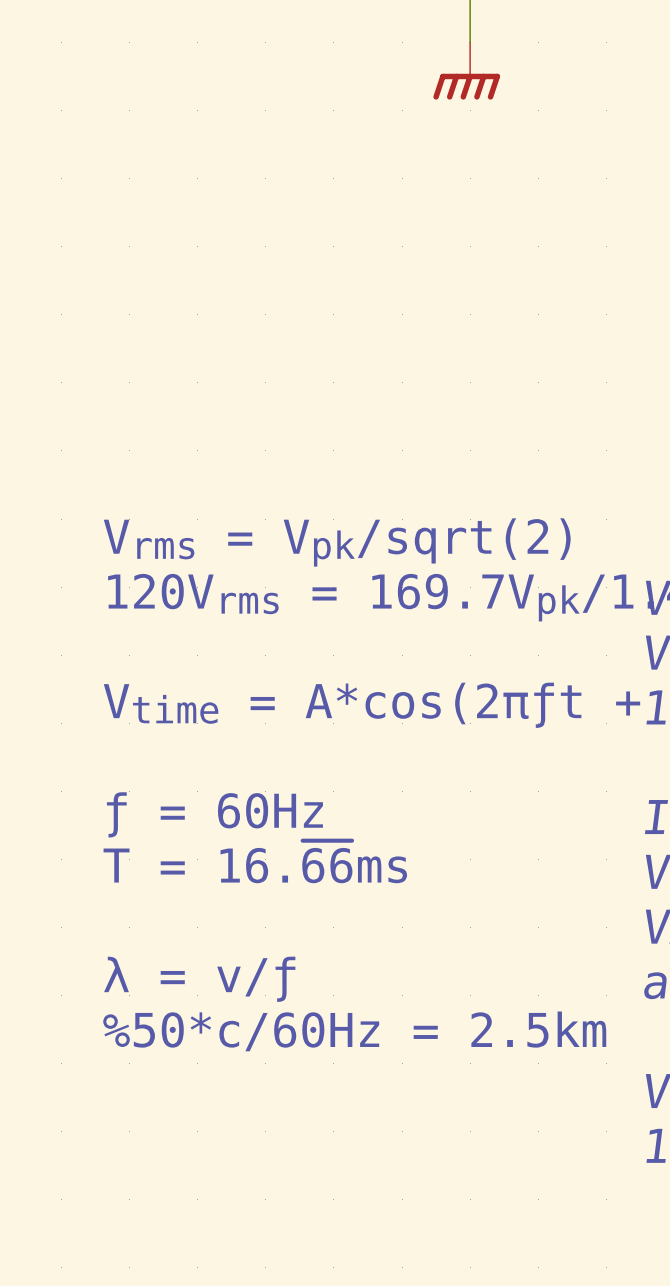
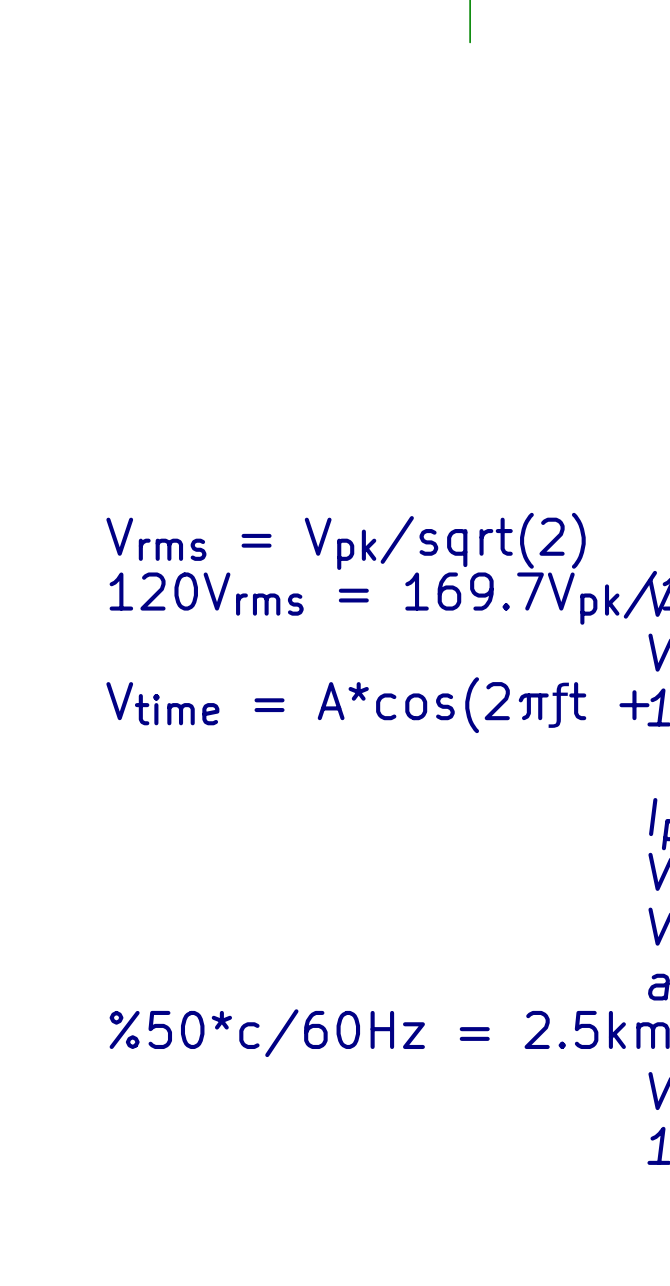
power symbol: (466, 71) -> none
text: ƒ = 60Hz (214, 814) -> none
text: T = 16.~{66}ms (255, 861) -> none
text: λ = v/ƒ (199, 979) -> none

